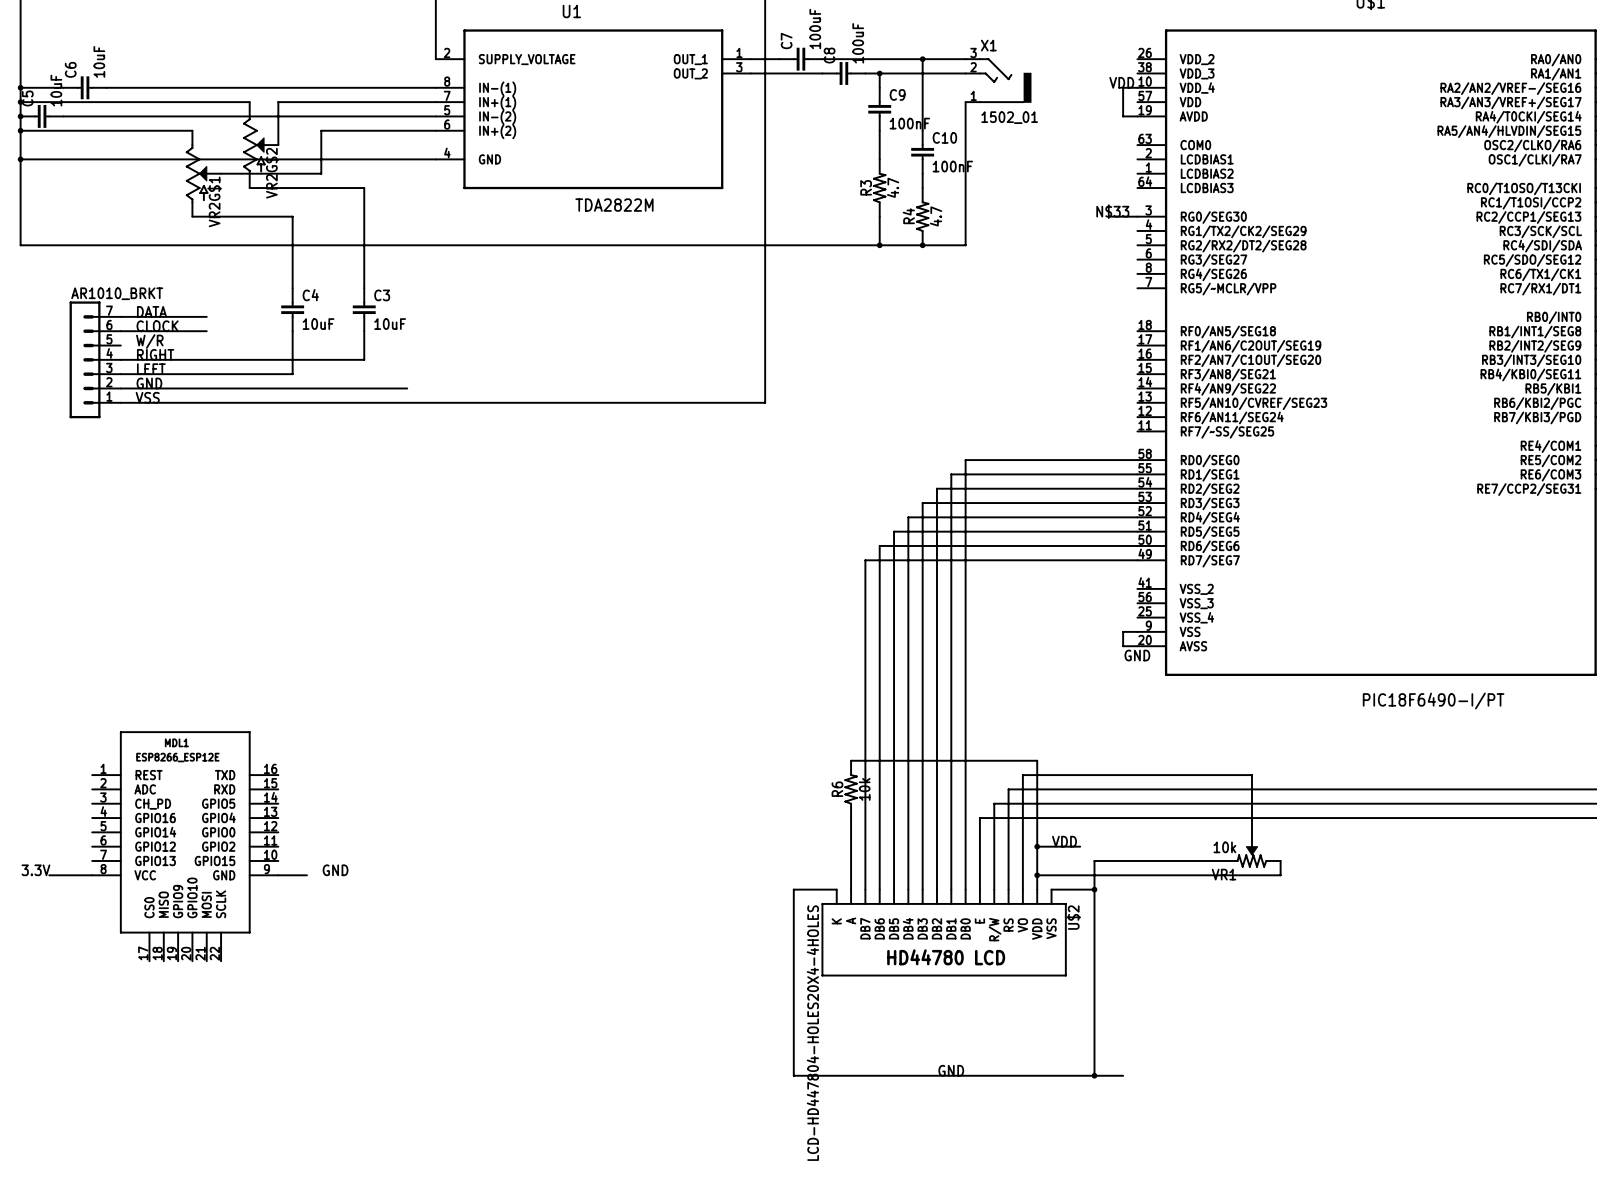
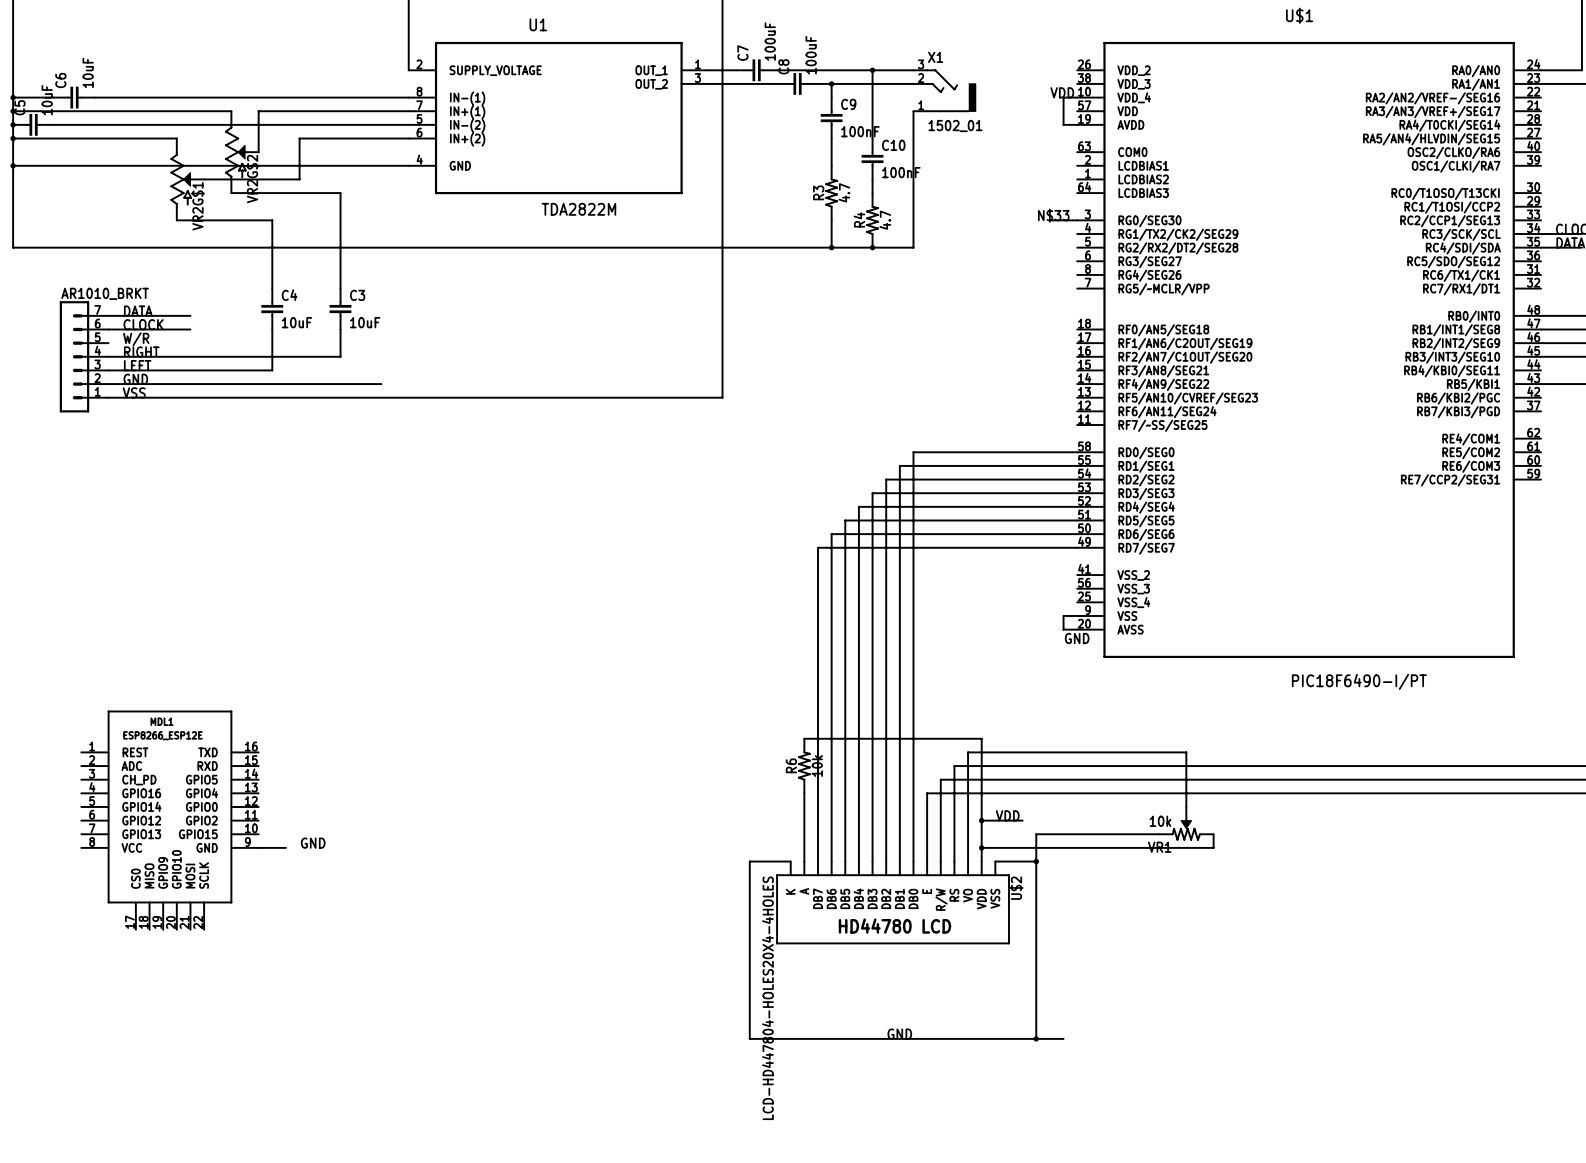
text: 3.3V (35, 870) -> none
wire: (49, 875) (92, 875) -> none

